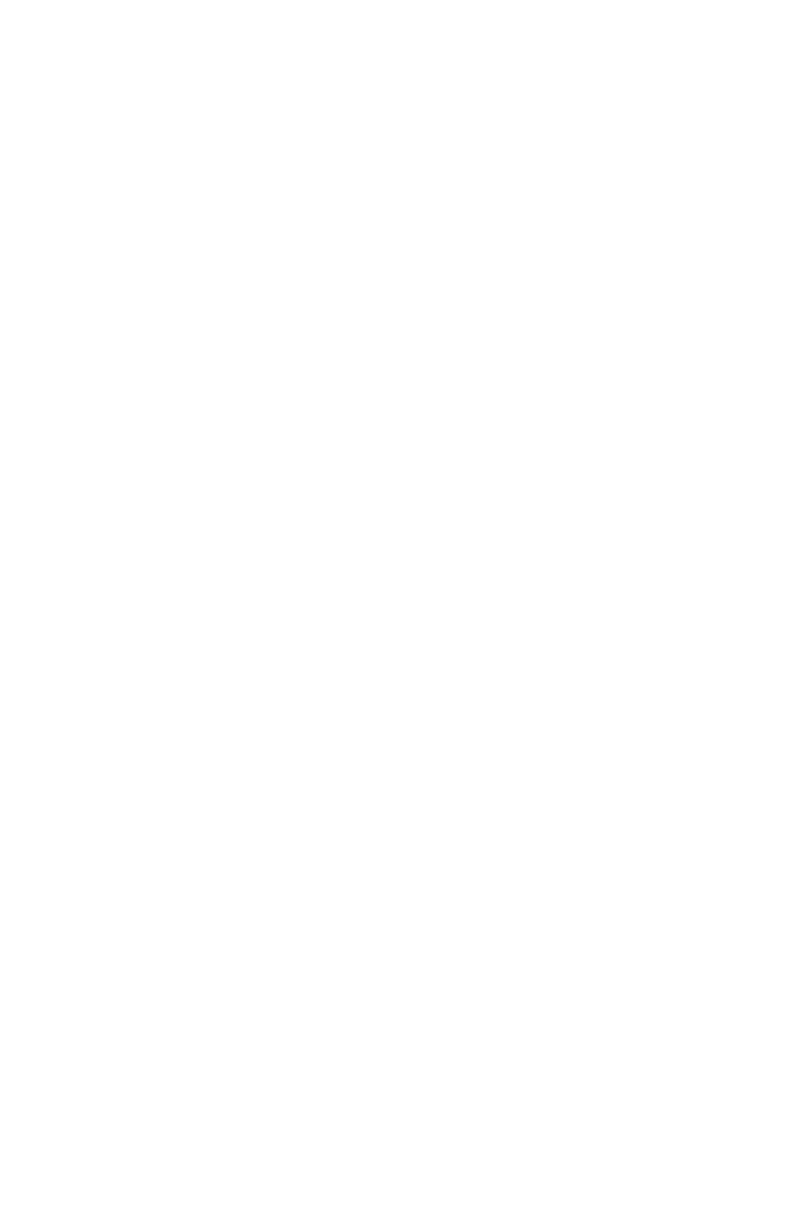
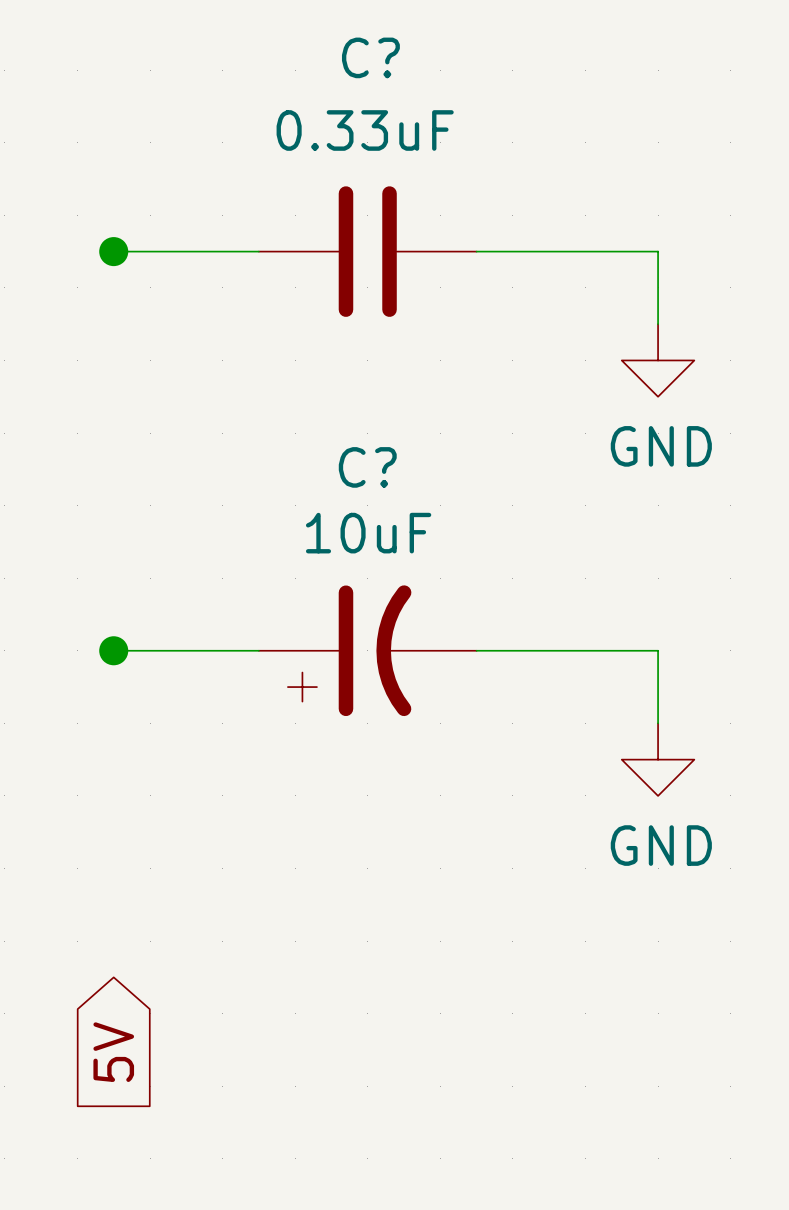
wire: none -> (113, 251) (258, 251)
junction: none -> (113, 251)
C?: none -> 0.33uF (367, 251)
wire: none -> (476, 251) (658, 251) (658, 324)
power symbol: none -> GND (658, 360)
wire: none -> (113, 650) (258, 650)
junction: none -> (113, 650)
C?: none -> 10uF (367, 650)
wire: none -> (476, 650) (658, 650) (658, 723)
power symbol: none -> GND (658, 759)
global label: none -> 5V (113, 1052)

